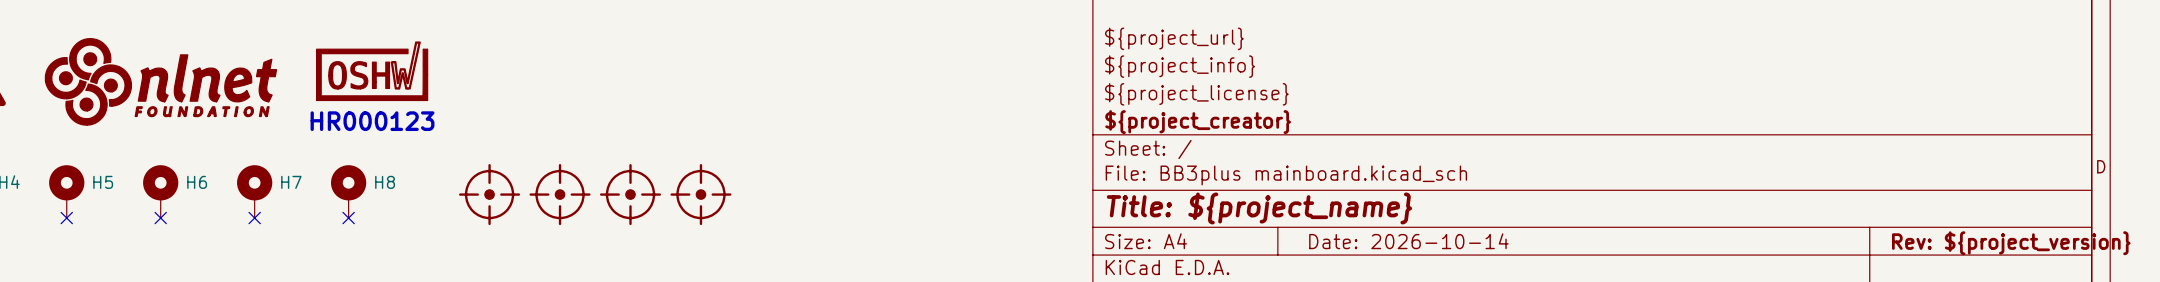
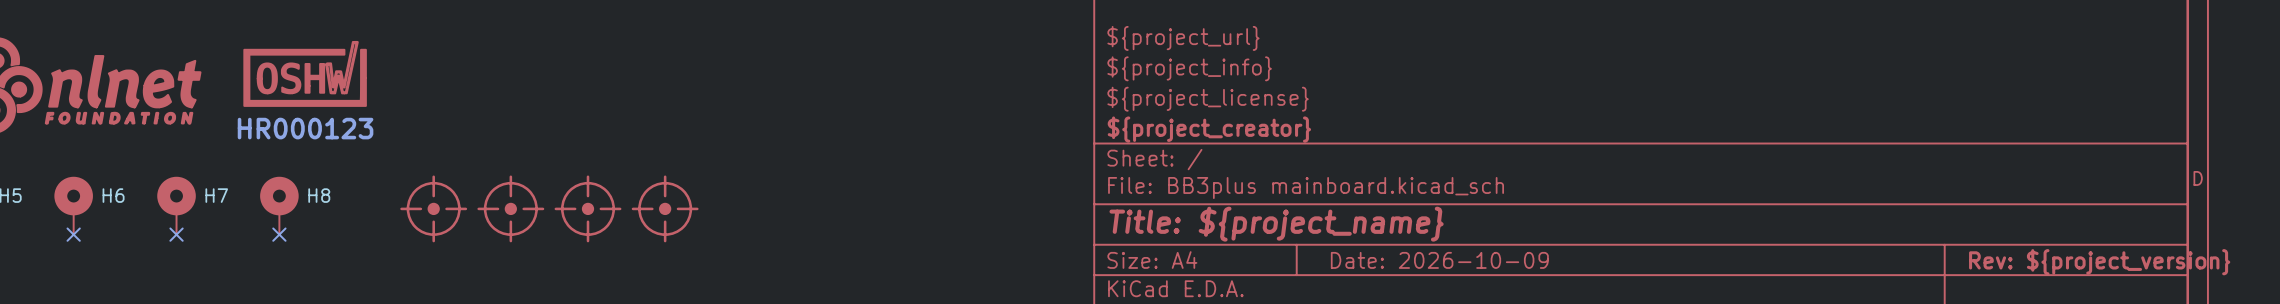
title block: Date: 2026-10-14 (1408, 241) -> Date: 2026-10-09 (1439, 260)

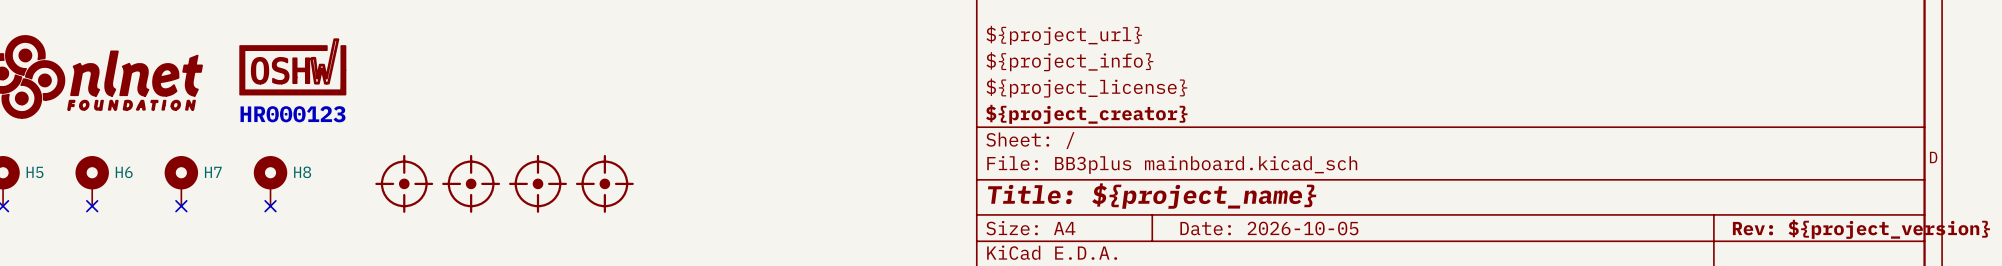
title block: Date: 2026-10-09 (1439, 260) -> Date: 2026-10-05 (1269, 228)

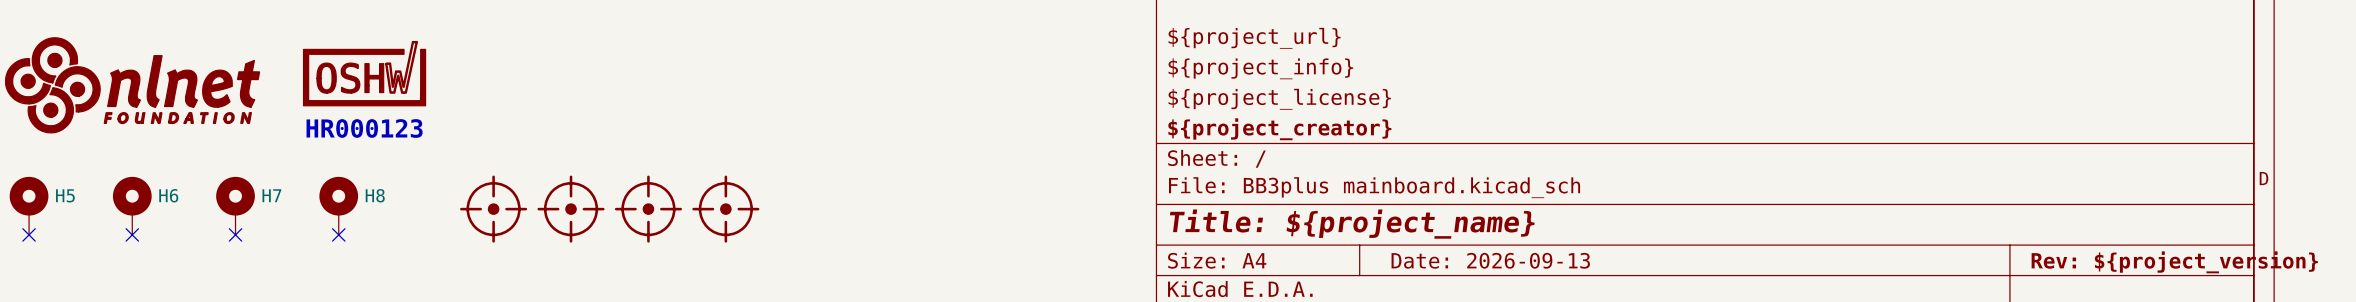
title block: Date: 2026-10-05 (1269, 228) -> Date: 2026-09-13 (1490, 260)

